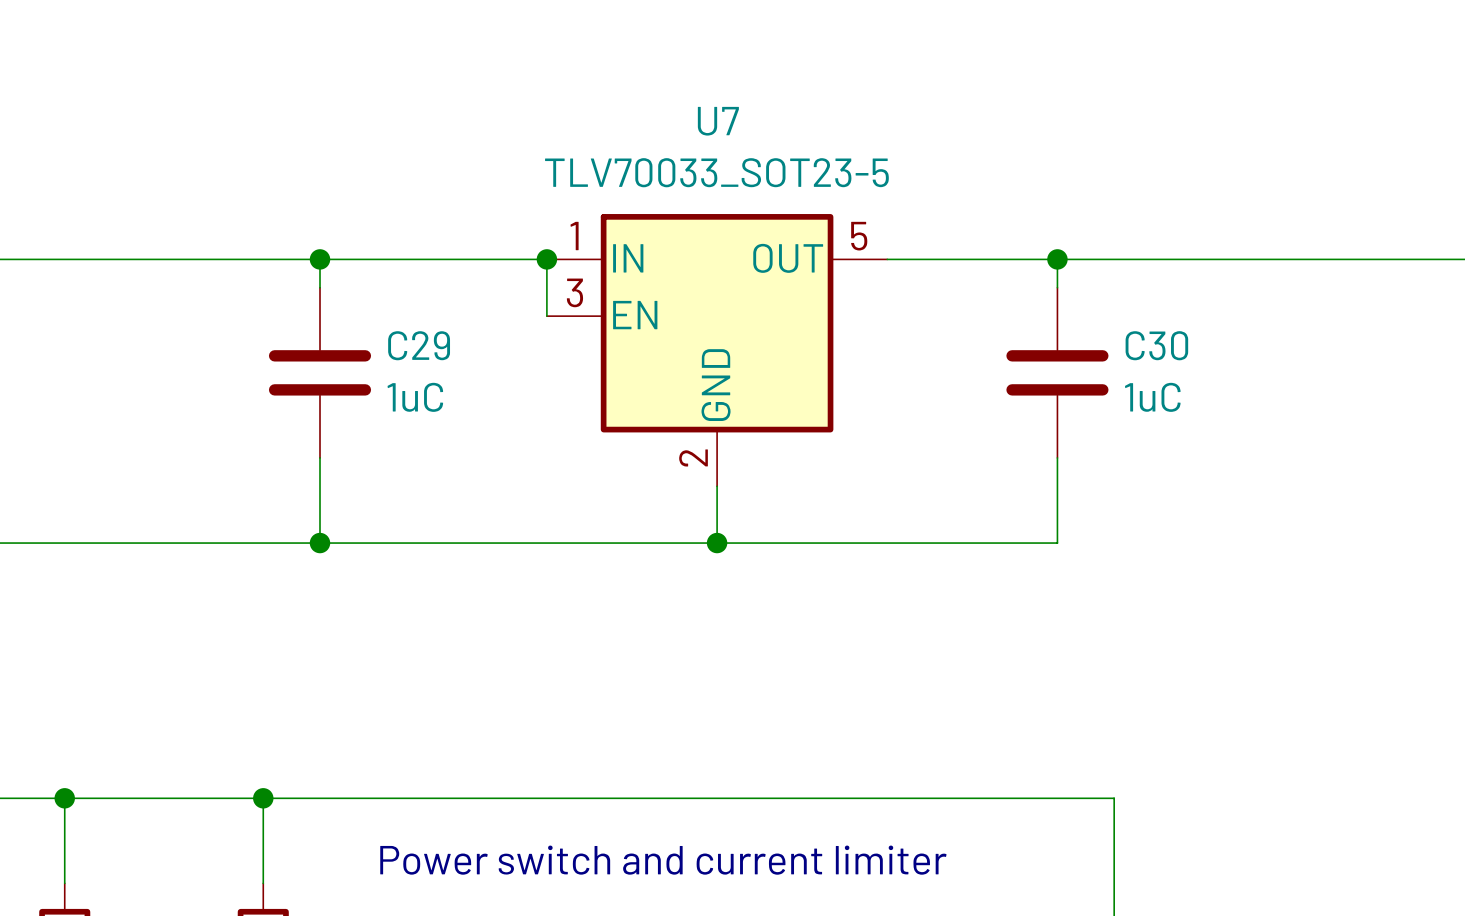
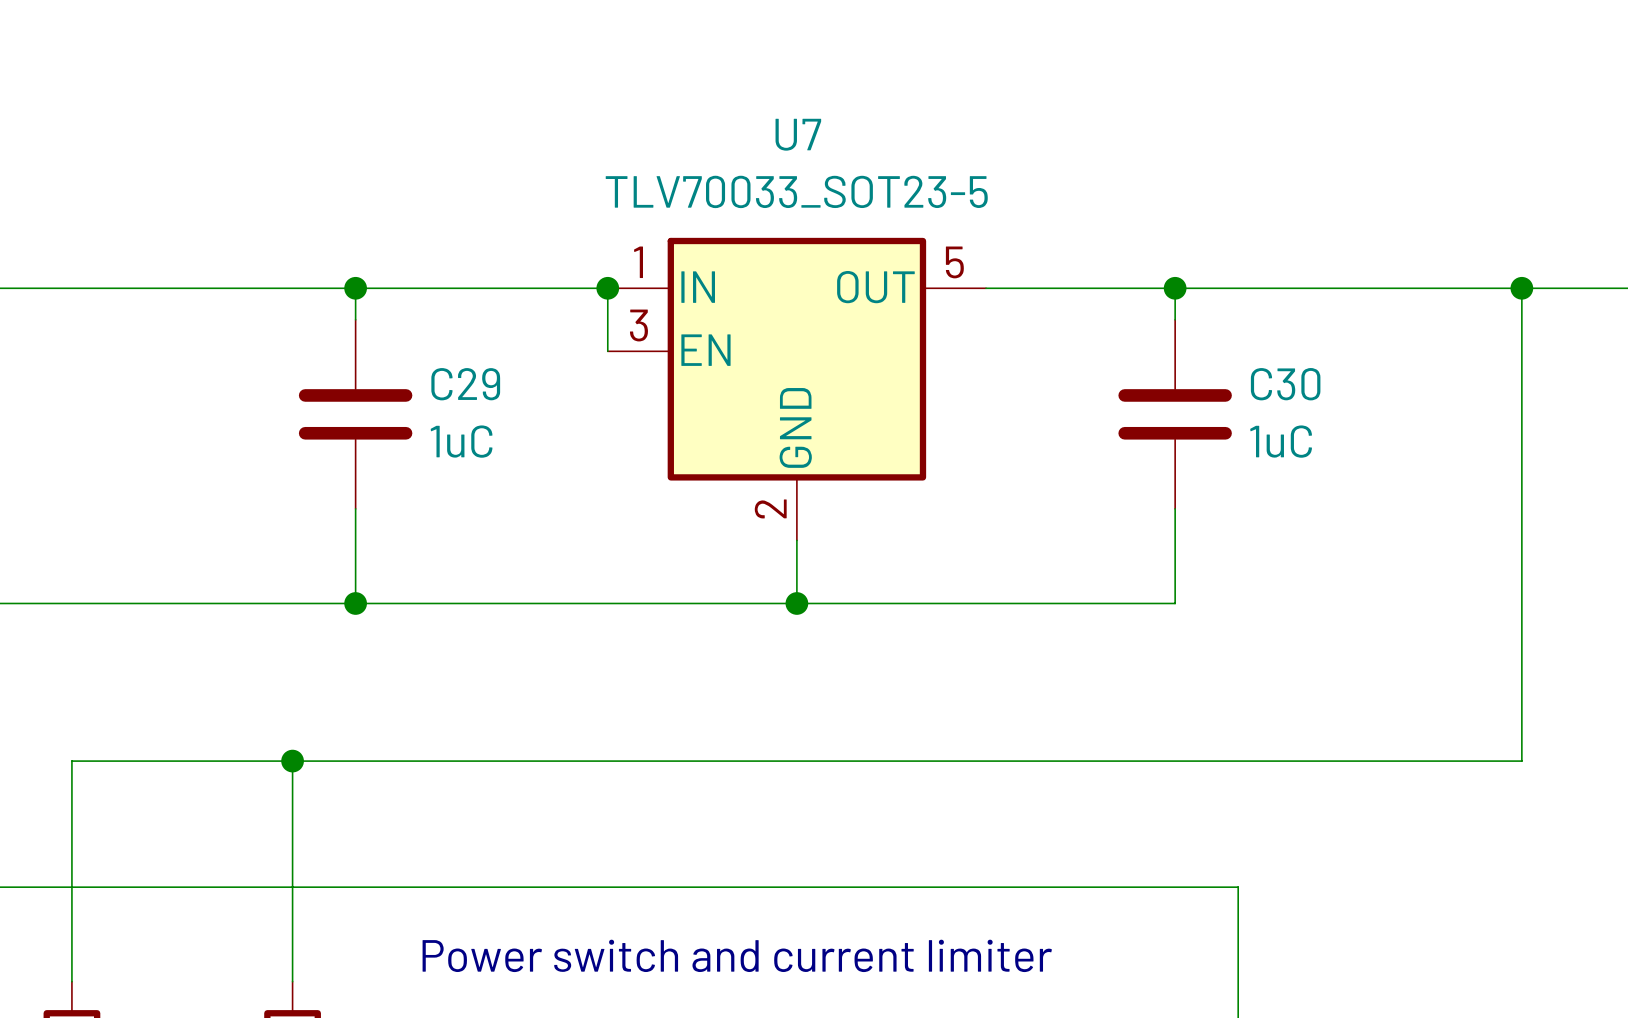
wire: none -> (1521, 288) (1521, 761) (71, 761) (71, 887)
junction: none -> (1521, 288)
wire: none -> (292, 761) (292, 887)
junction: (64, 798) -> none
junction position: (263, 798) -> (292, 761)

